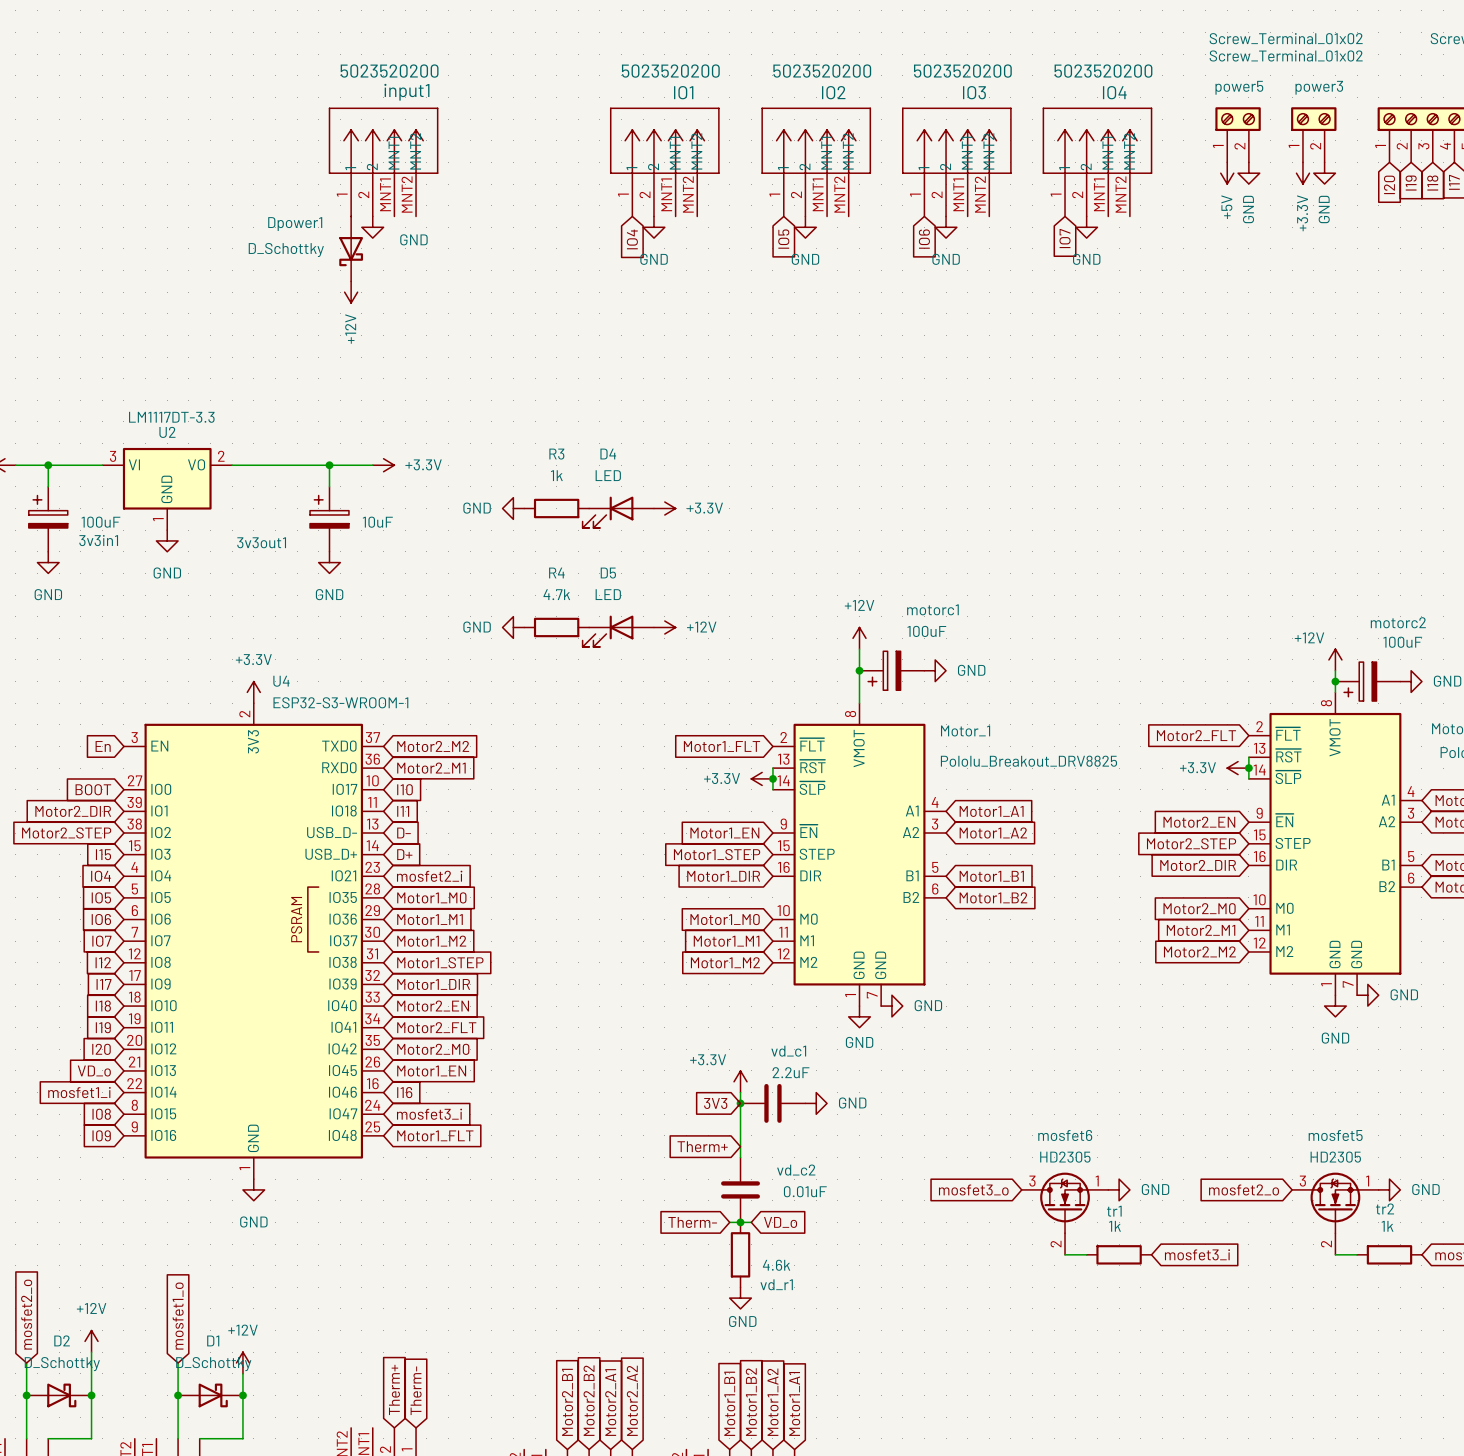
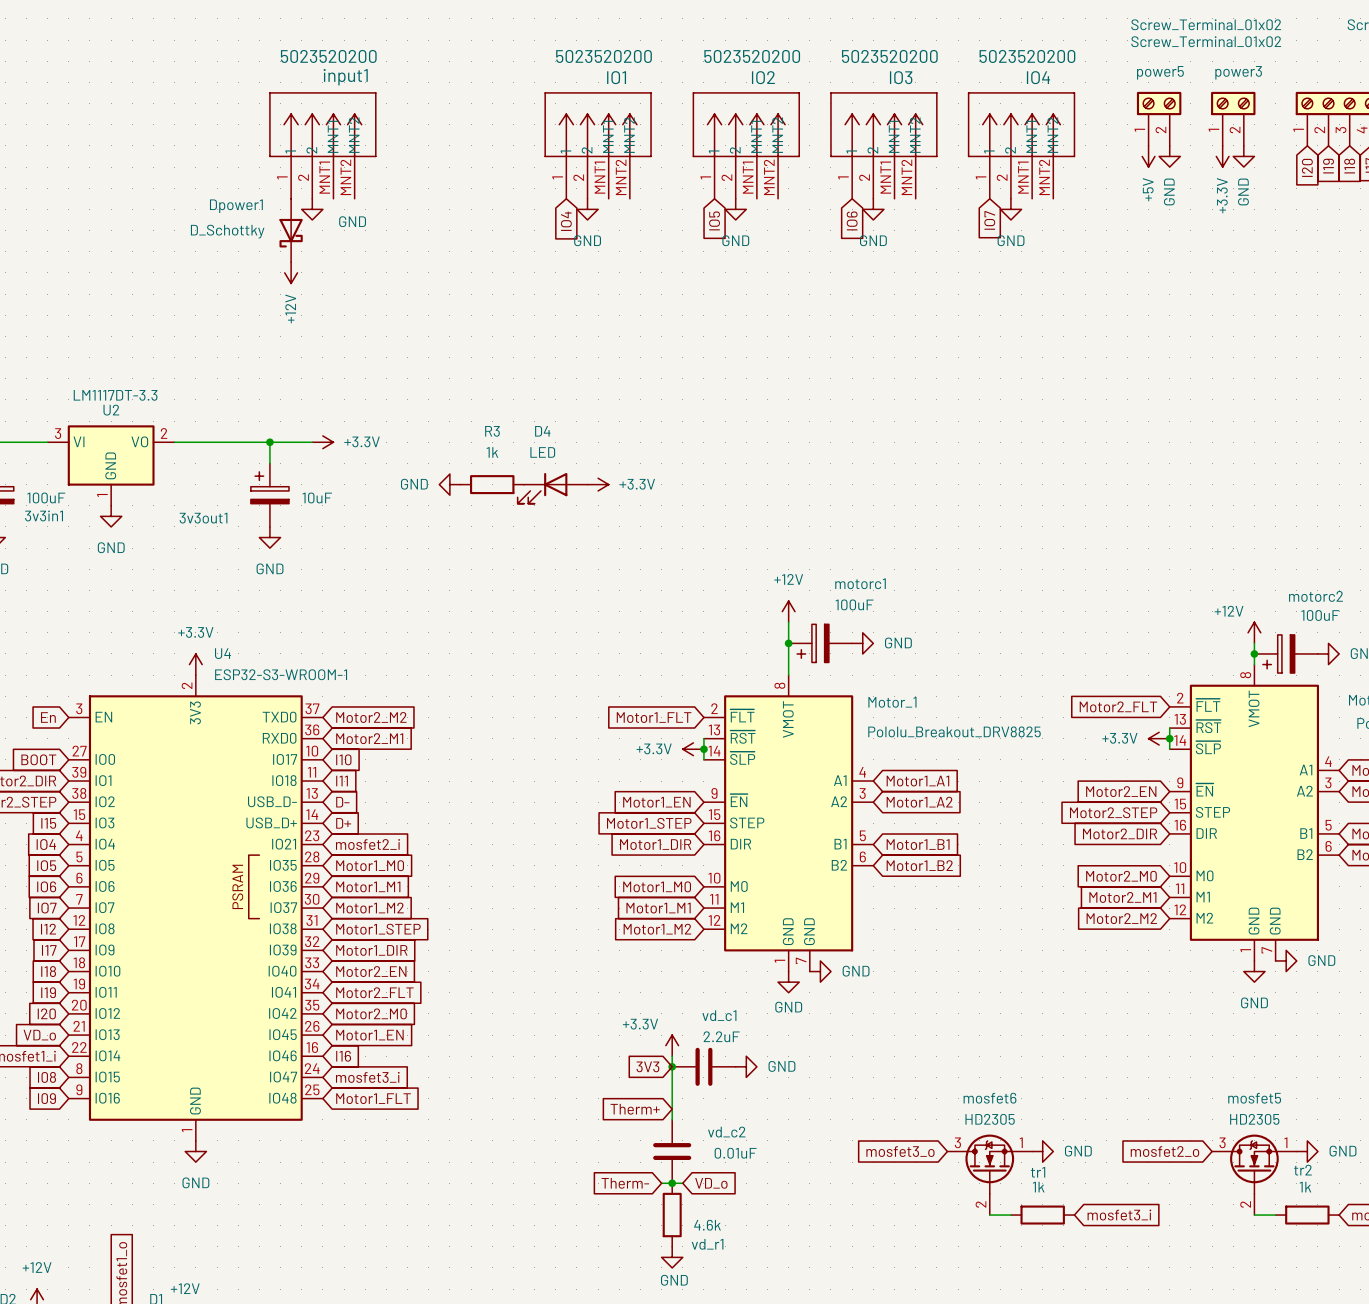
power symbol: GND (513, 627) -> none
R4: 4.7k (556, 627) -> none
power symbol: +12V (664, 627) -> none
D5: LED (618, 631) -> none

